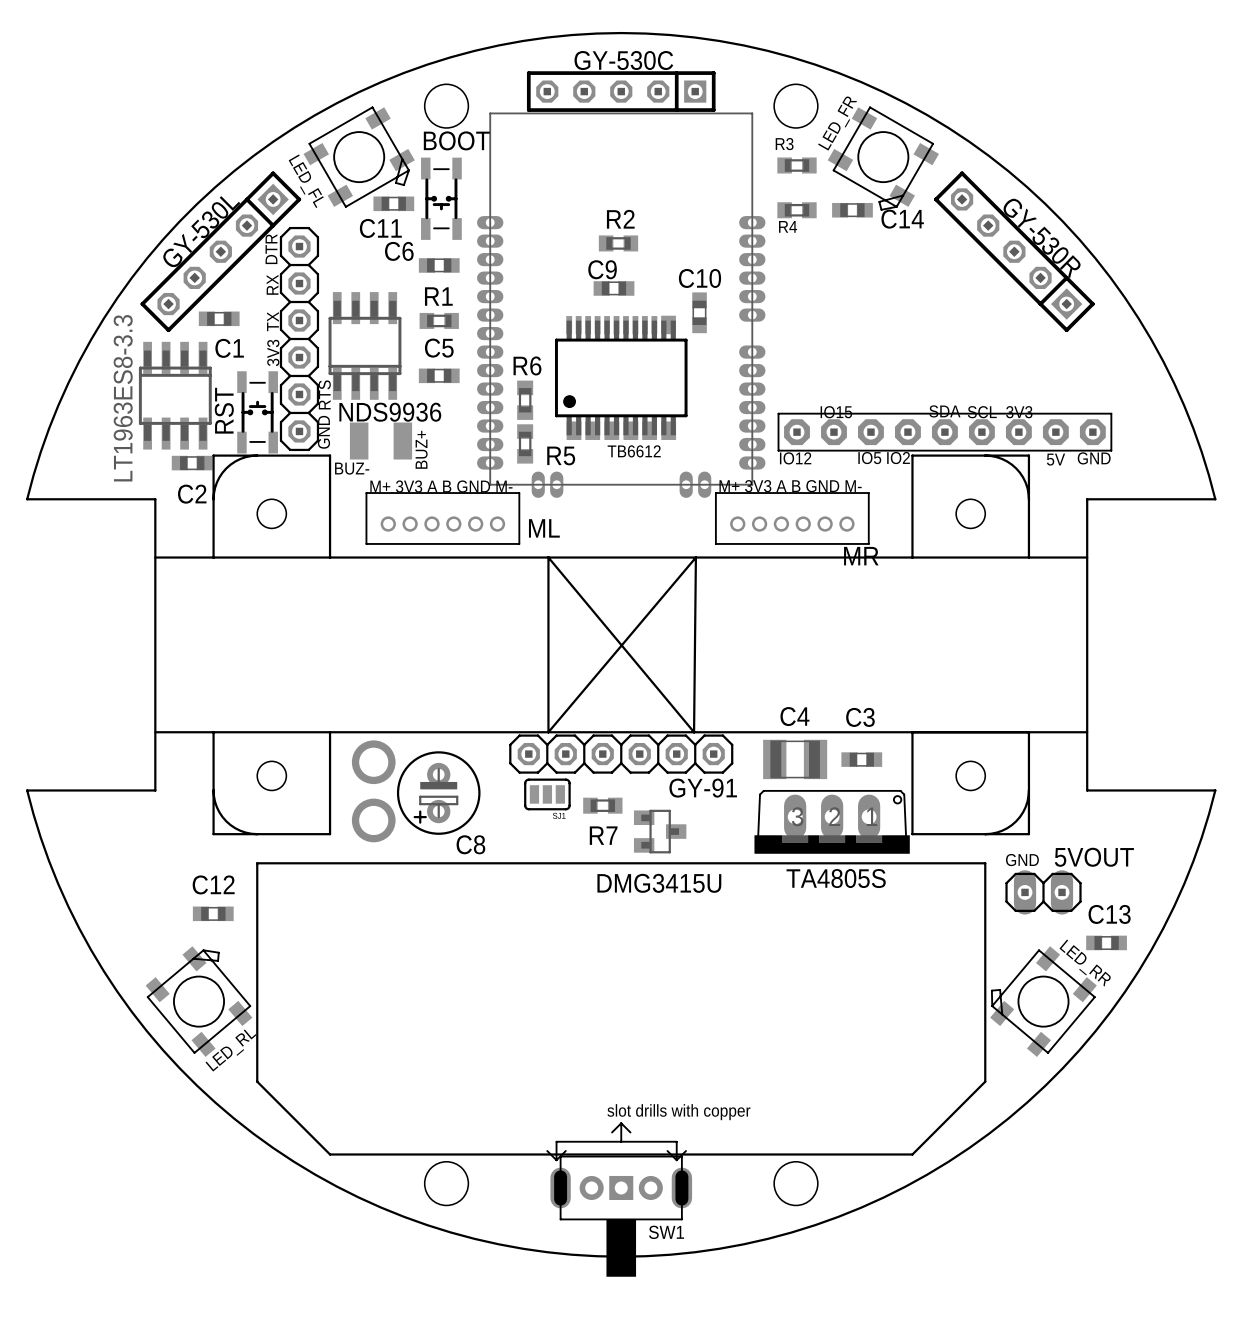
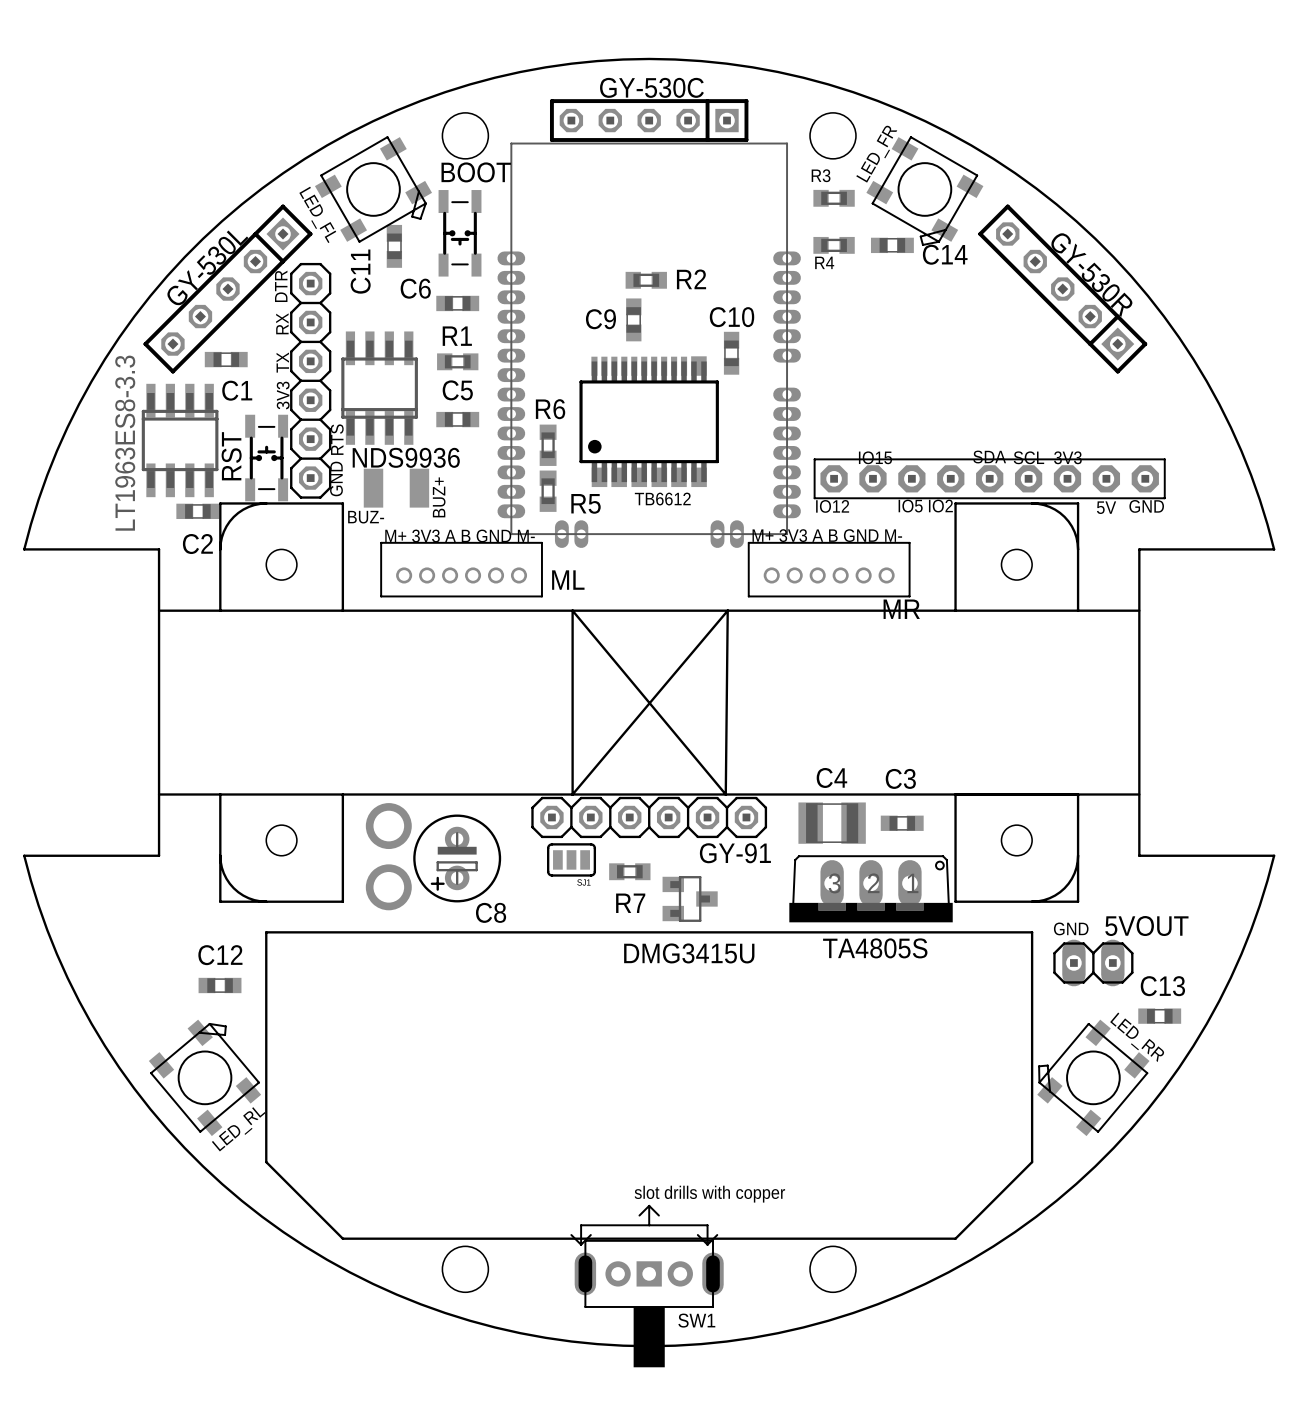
C11 rotation: 0° (393, 203) -> 90° clockwise (394, 246)
R2 name position: R2 (620, 219) -> R2 (691, 279)
C9 rotation: 0° (614, 288) -> 90° clockwise (633, 319)

